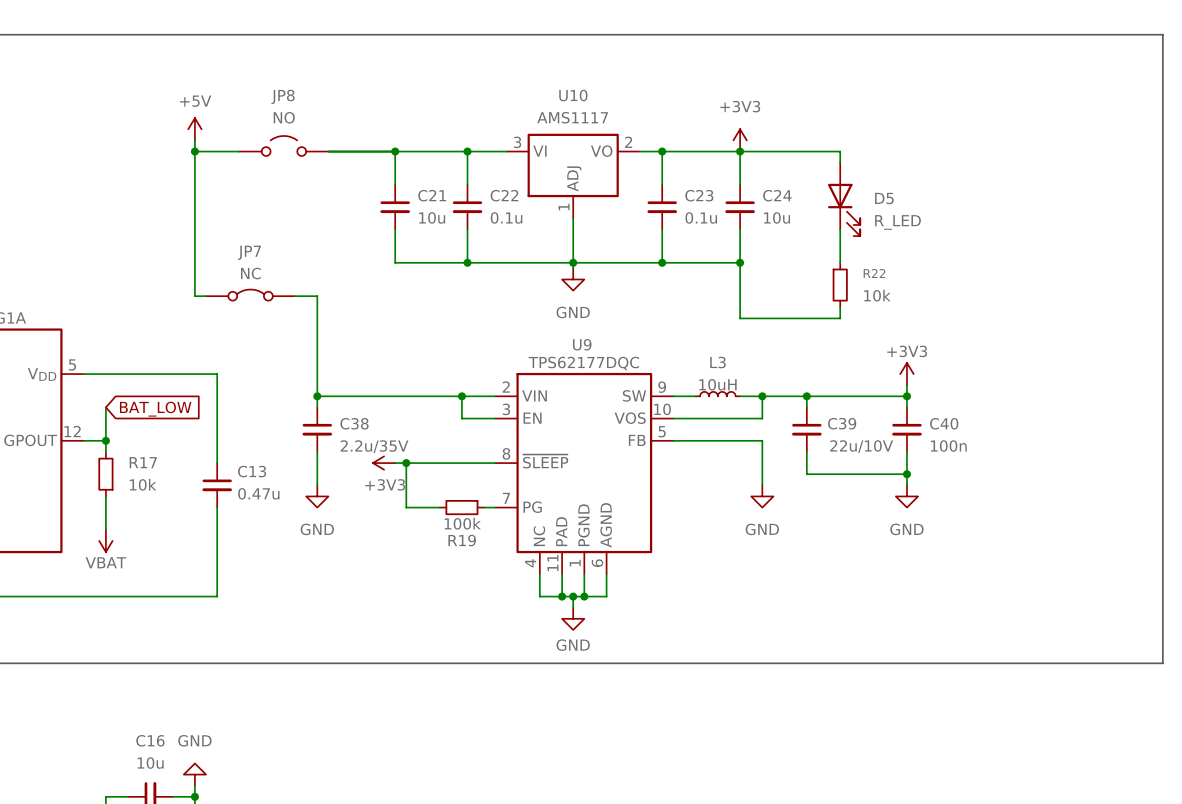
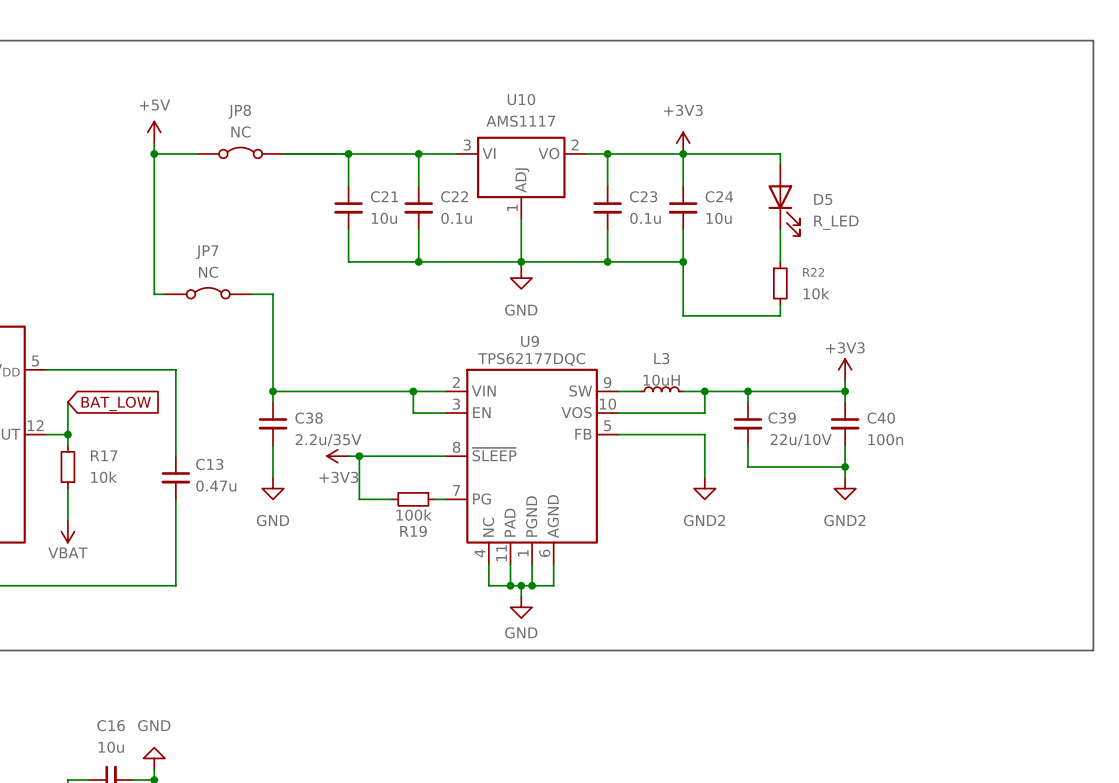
JP8 value: NO (284, 117) -> NC (240, 131)
JP8 symbol: [239, 135, 329, 156] -> [197, 147, 284, 159]
power symbol: GND (762, 496) -> GND2 (704, 488)
power symbol: GND (906, 496) -> GND2 (845, 488)

